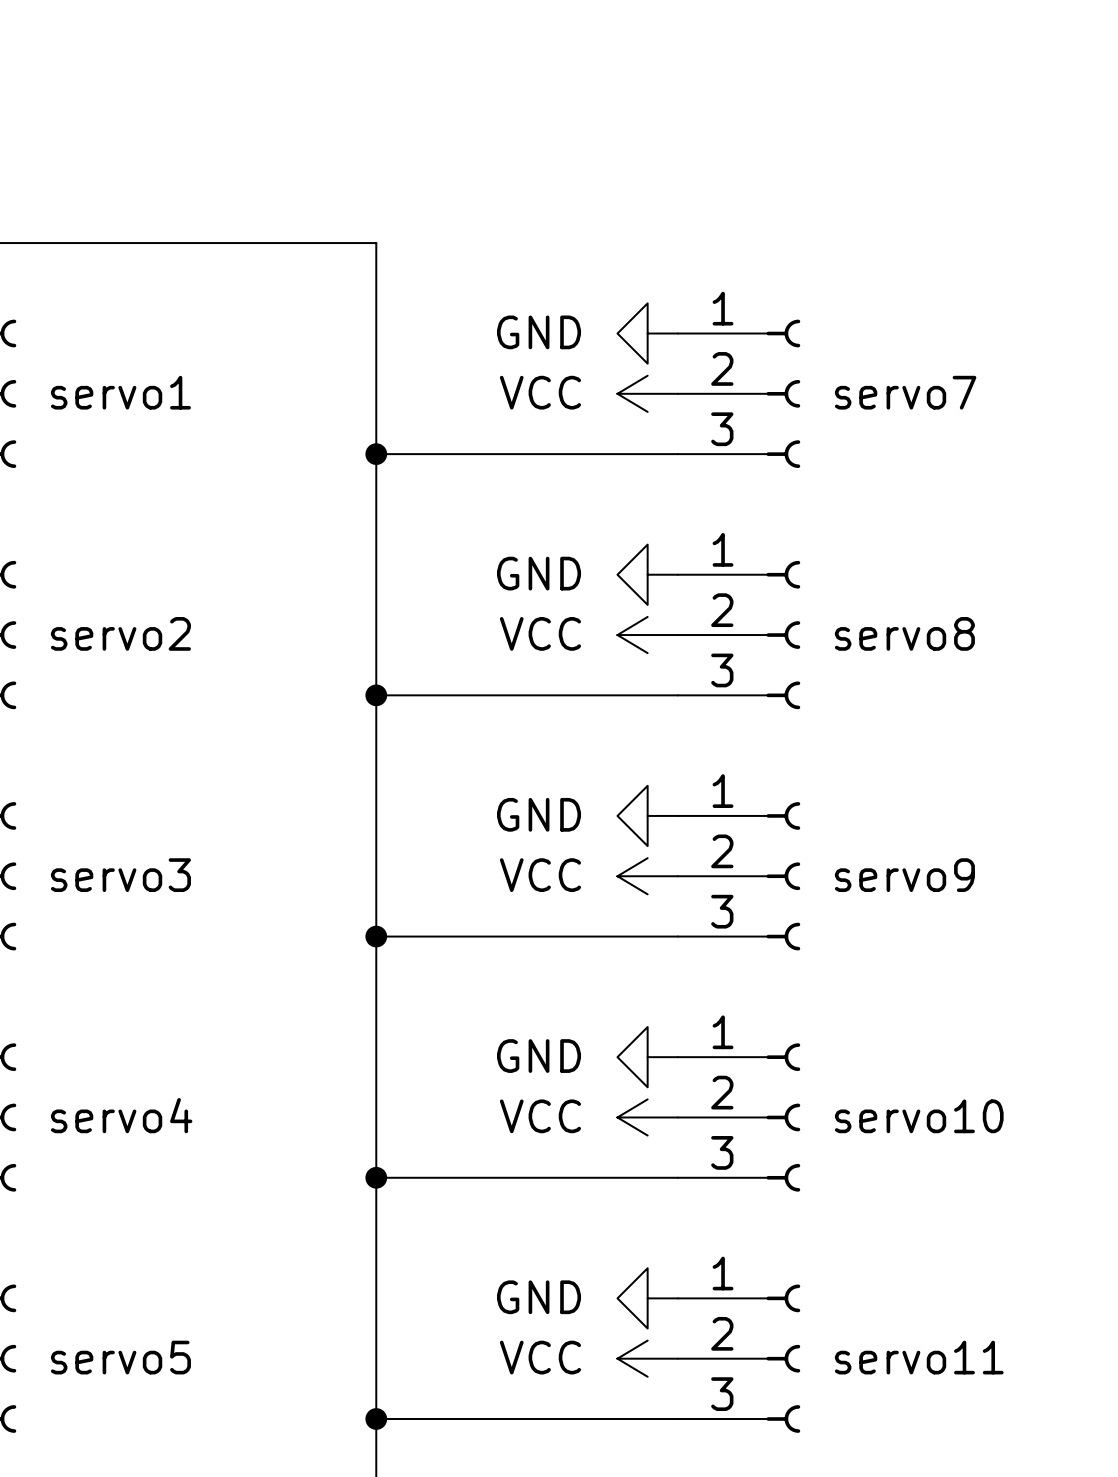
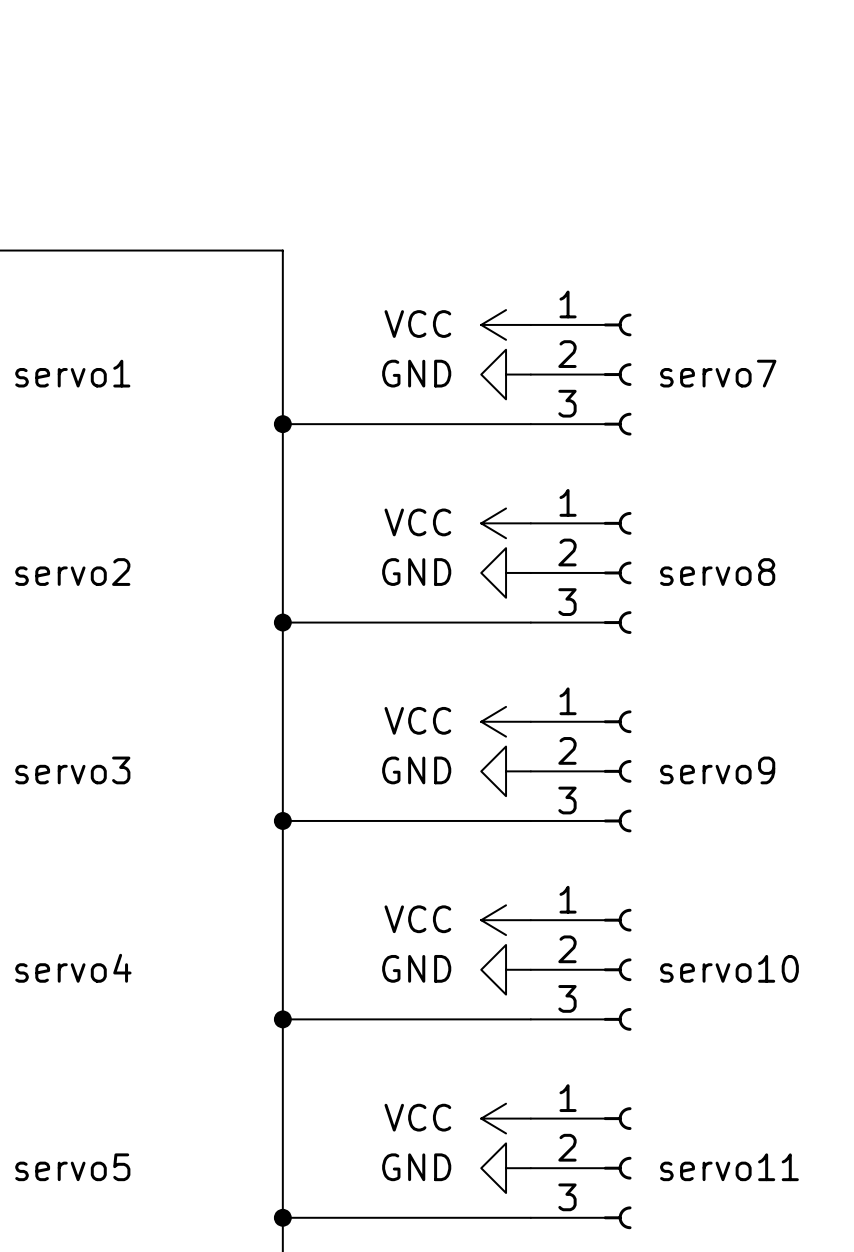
power symbol: GND (647, 333) -> VCC (506, 324)
power symbol: VCC (647, 393) -> GND (506, 374)
power symbol: GND (647, 574) -> VCC (506, 523)
power symbol: VCC (647, 635) -> GND (506, 572)
power symbol: GND (647, 815) -> VCC (506, 721)
power symbol: VCC (647, 876) -> GND (506, 771)
power symbol: GND (647, 1057) -> VCC (506, 920)
power symbol: VCC (647, 1117) -> GND (506, 969)
power symbol: GND (647, 1298) -> VCC (506, 1118)
power symbol: VCC (647, 1358) -> GND (506, 1168)

